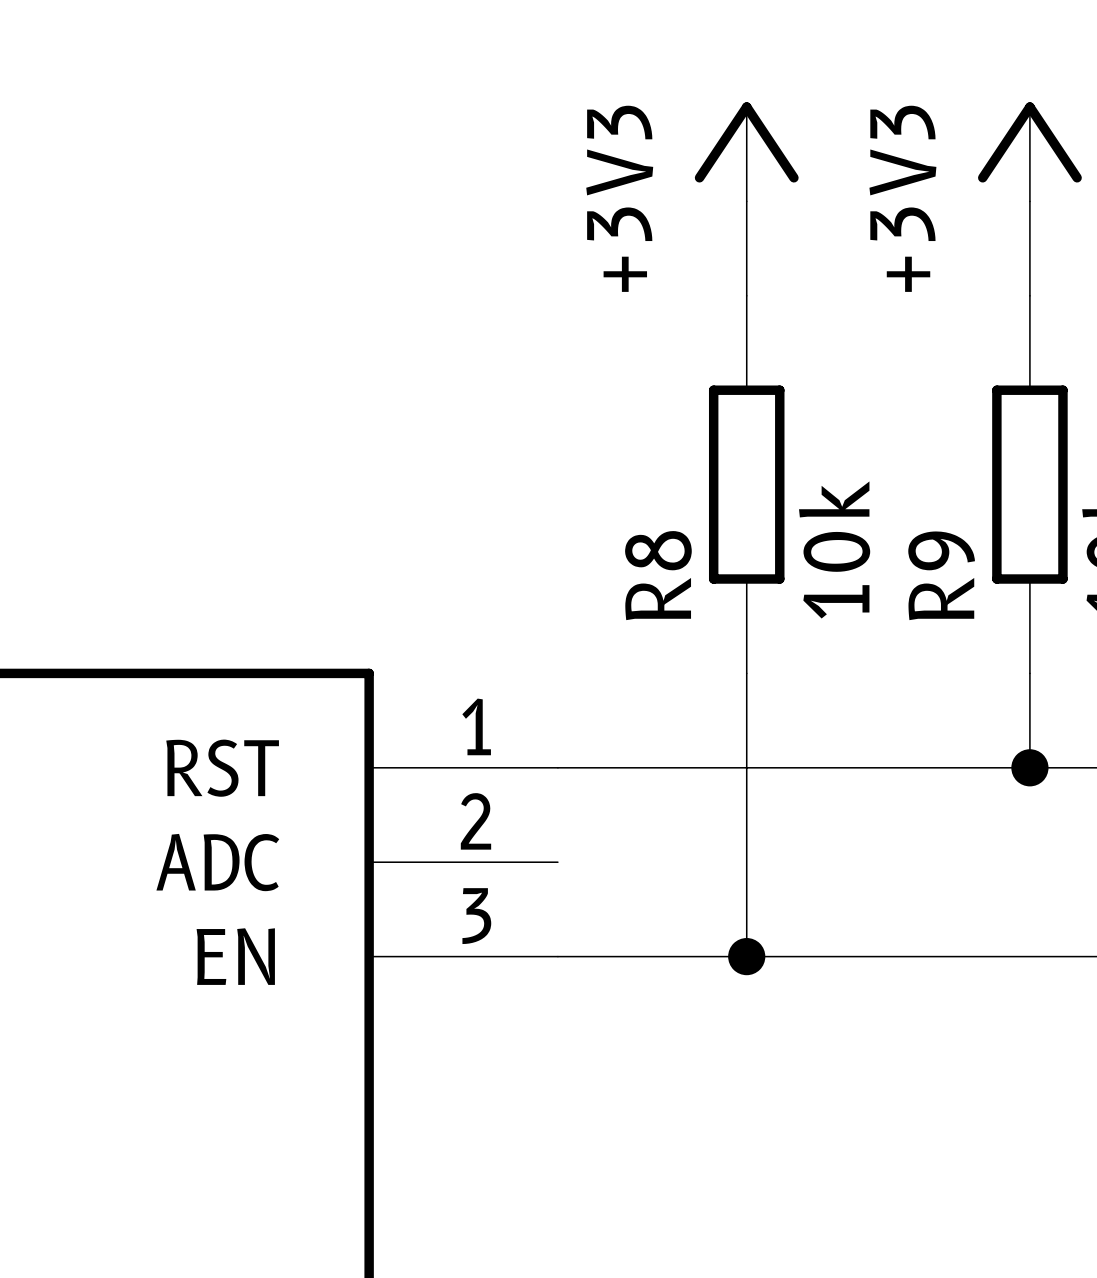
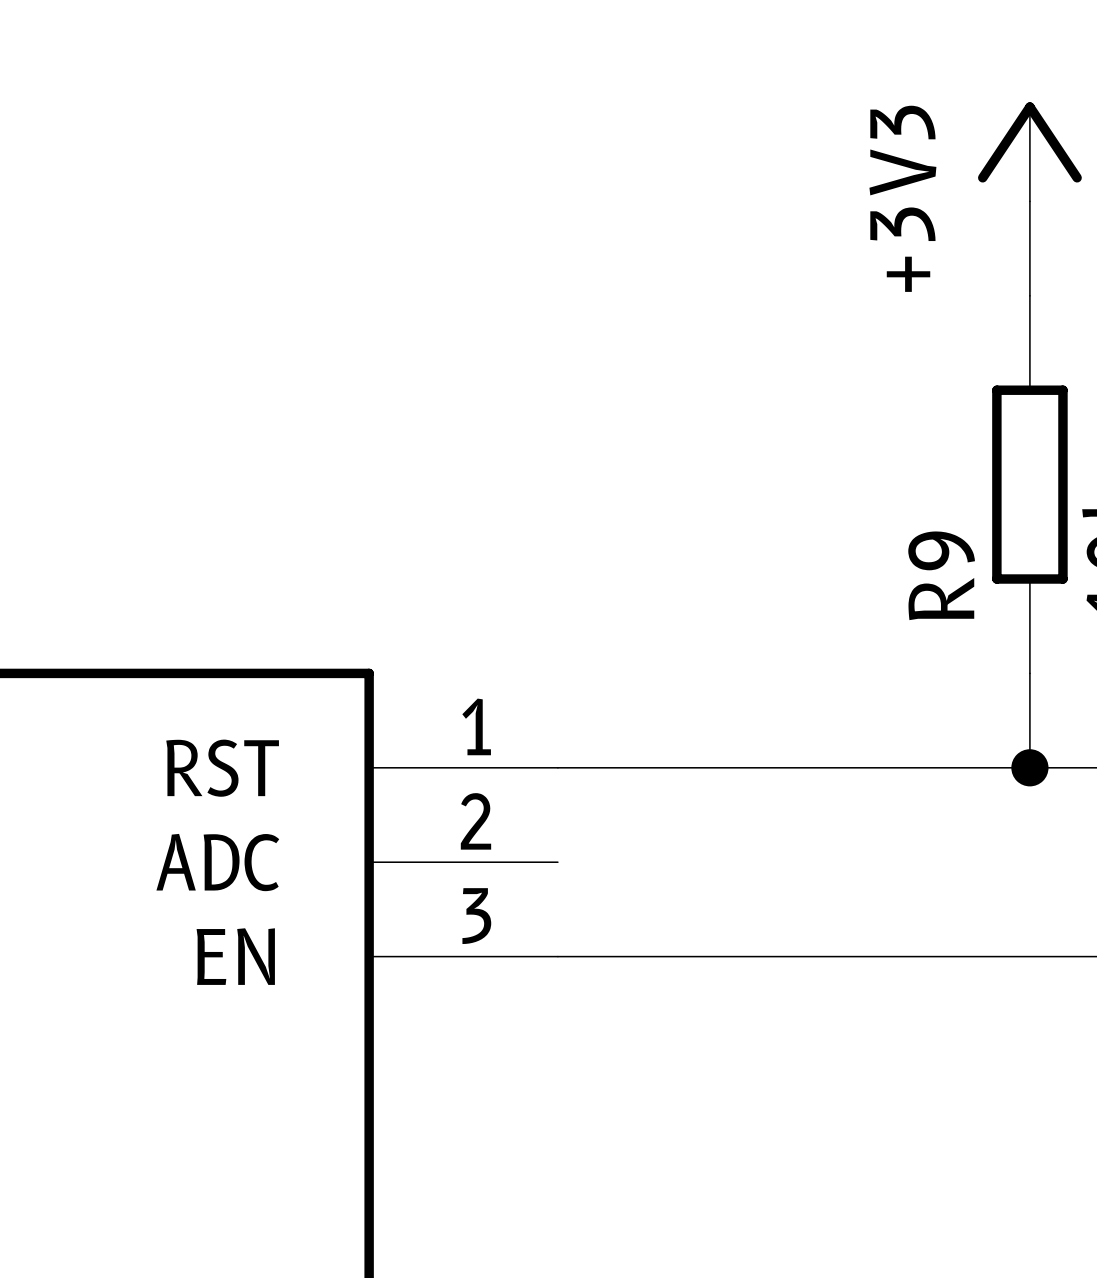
power symbol: +3V3 (746, 151) -> none
wire: (746, 201) (746, 295) -> none
R8: 10k (746, 484) -> none
wire: (746, 673) (746, 956) -> none
junction: (746, 956) -> none

